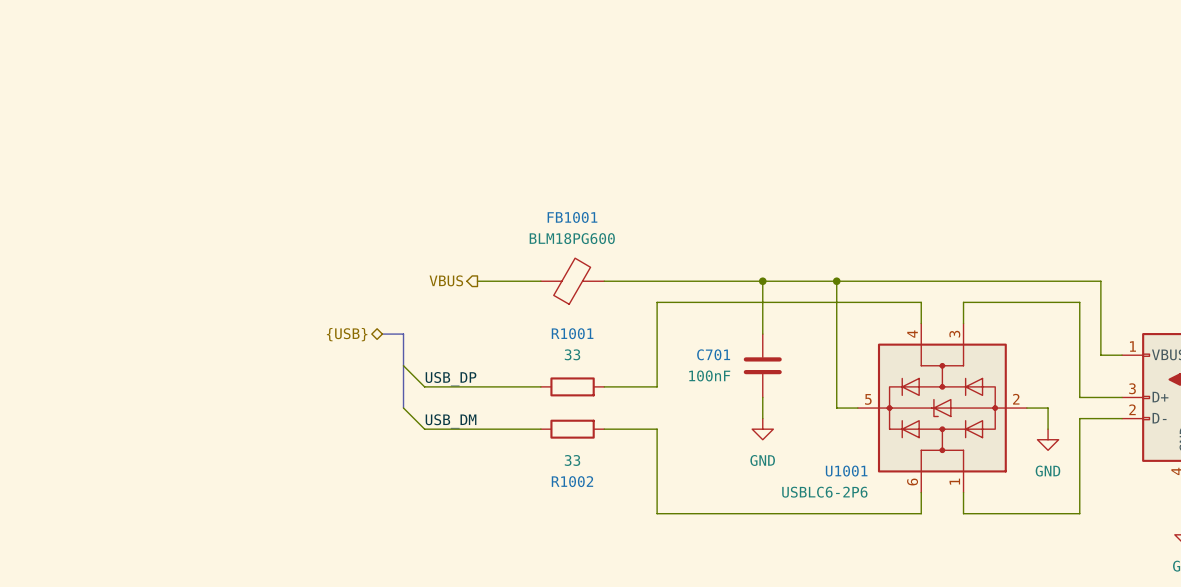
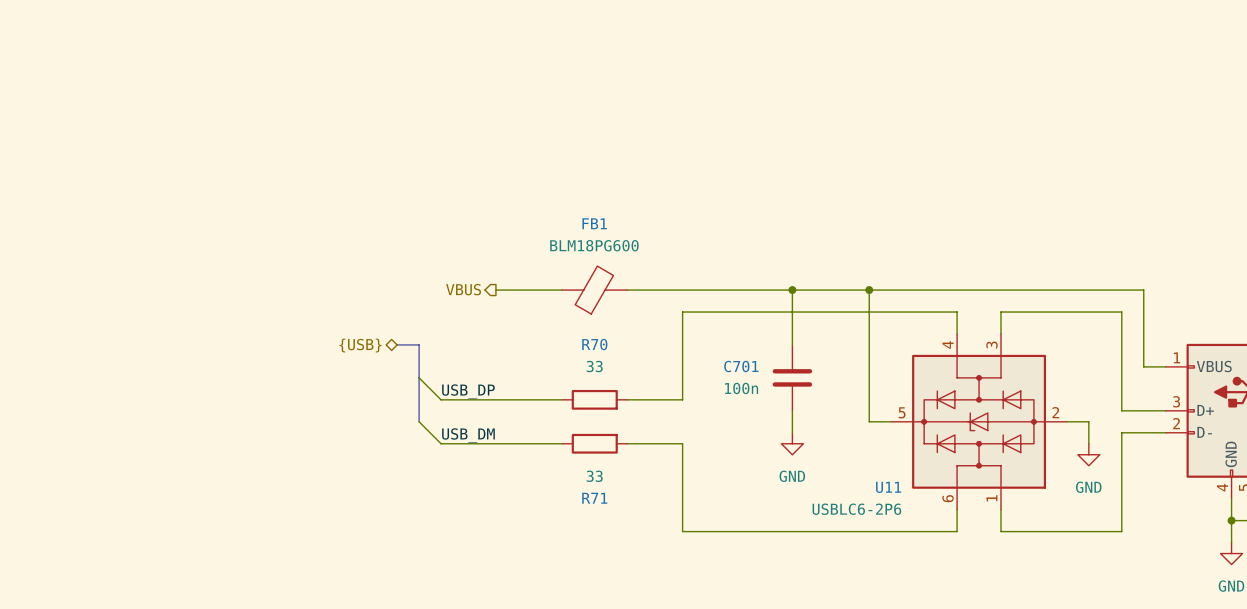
FB1001 name: FB1001 (572, 217) -> FB1 (594, 223)
R1001 name: R1001 (572, 333) -> R70 (594, 344)
C701 value: 100nF (709, 375) -> 100n (741, 388)
U1001 name: U1001 (846, 471) -> U11 (888, 487)
R1002 name: R1002 (572, 481) -> R71 (594, 498)

